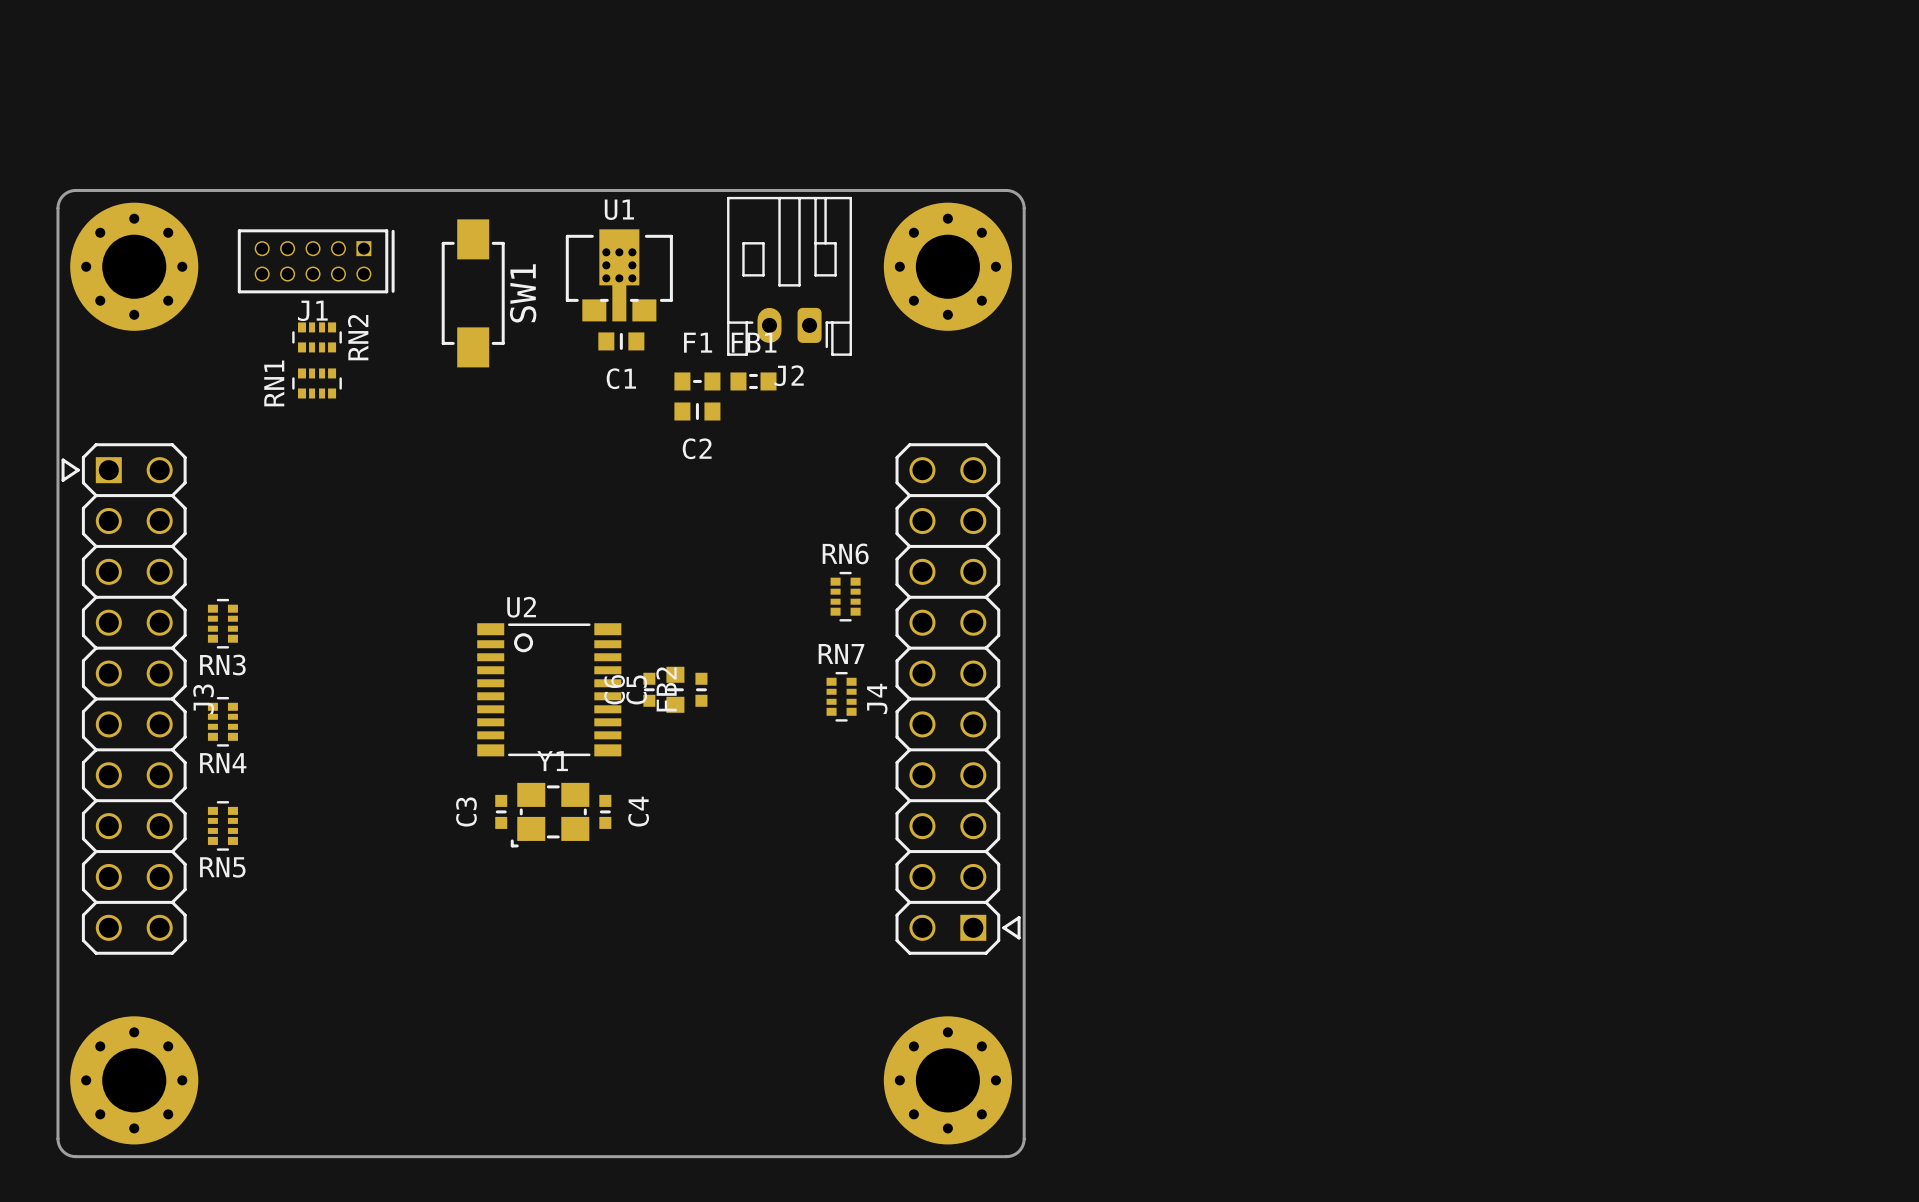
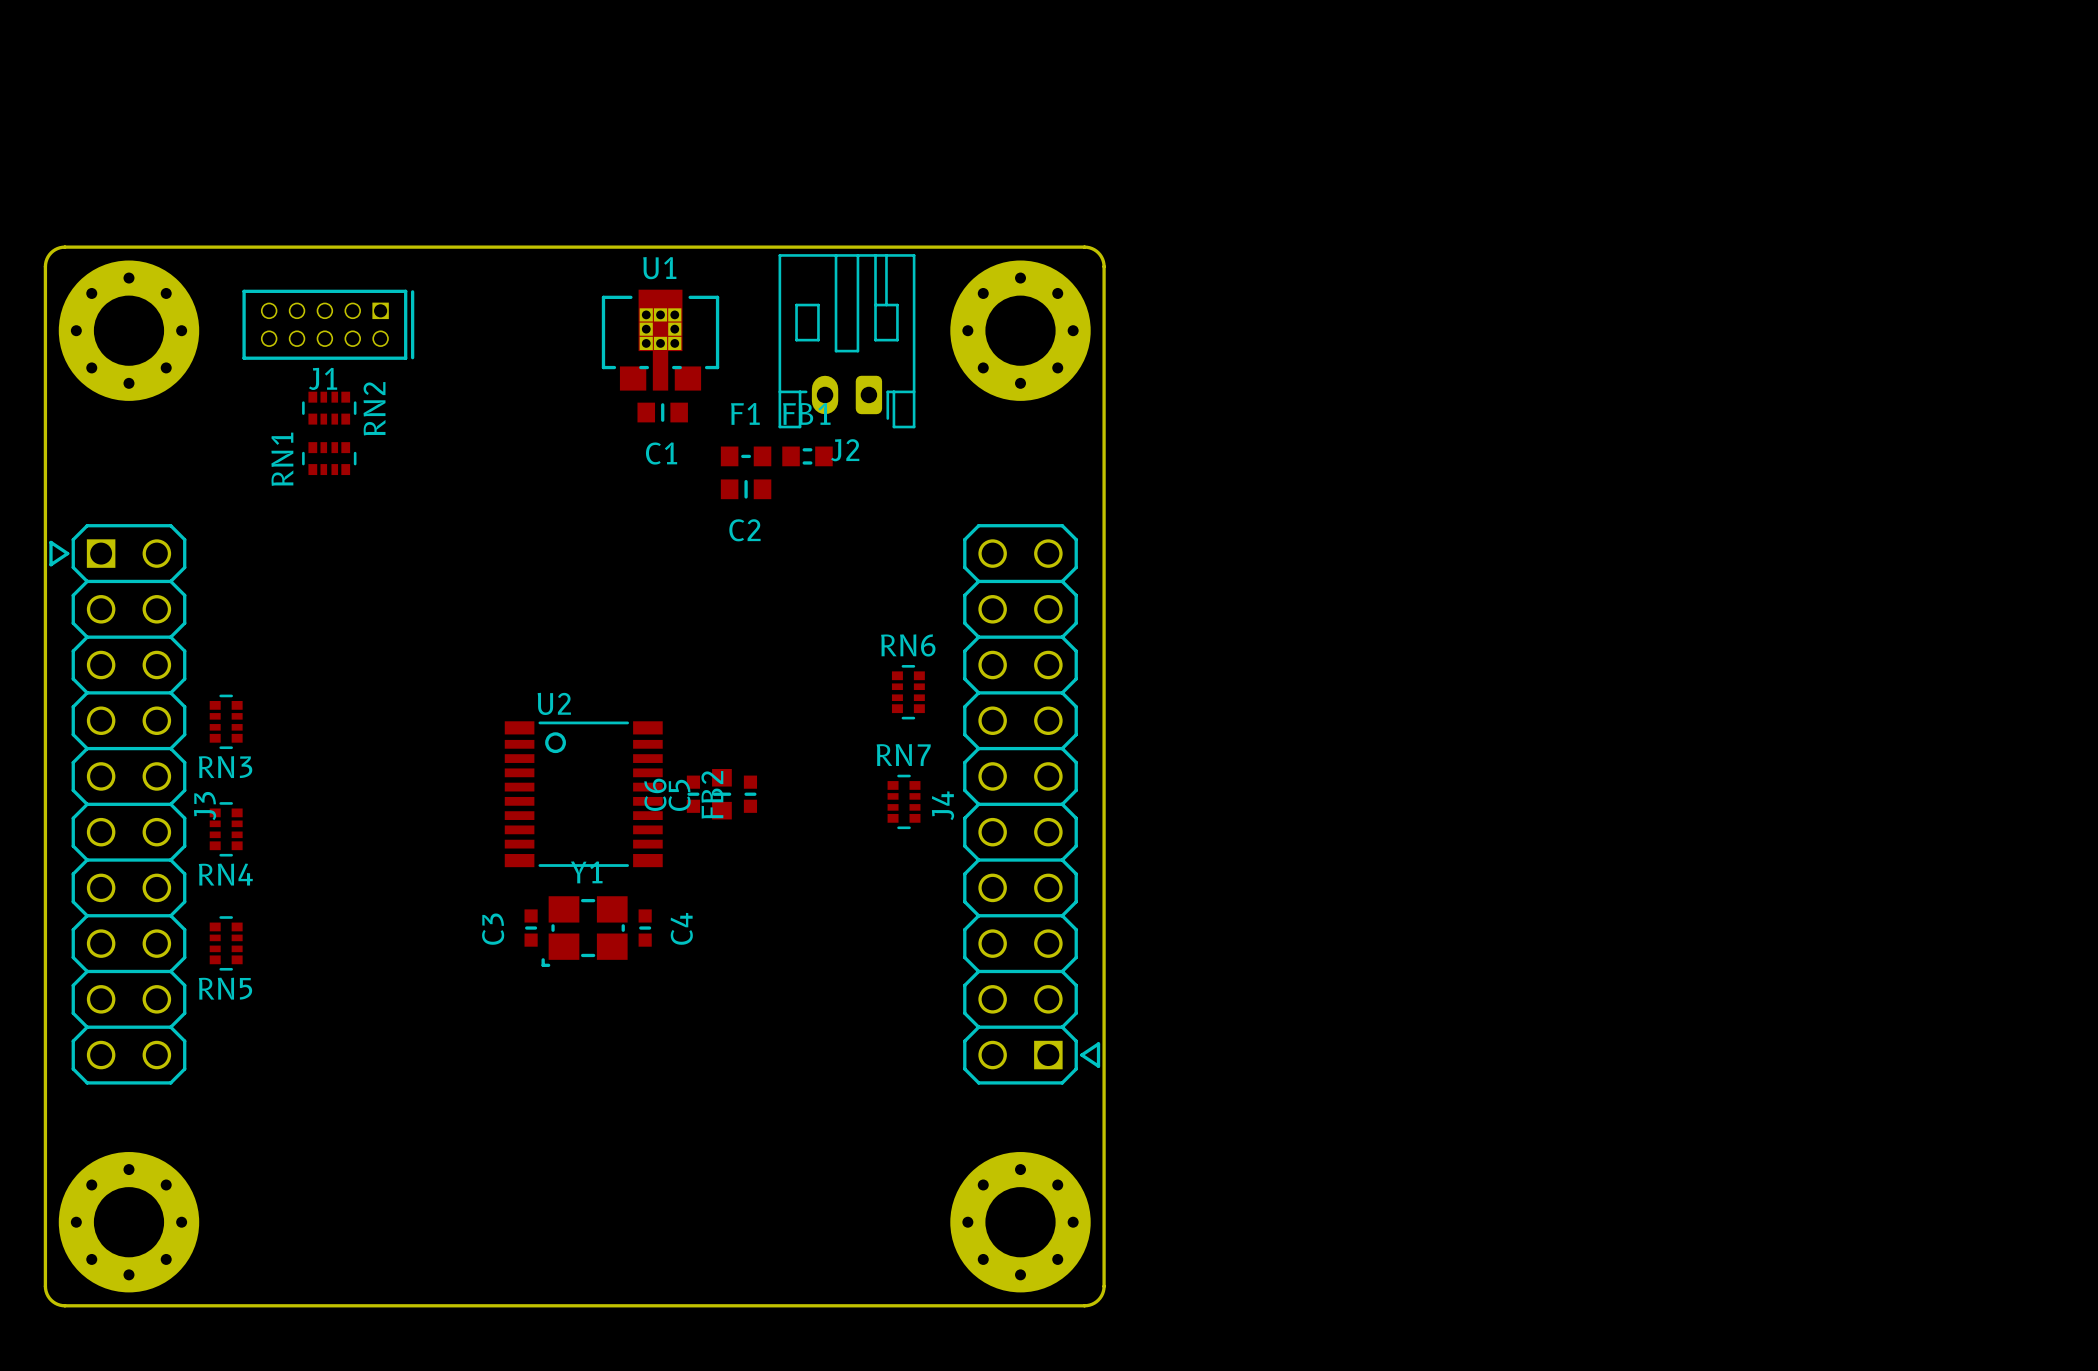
SW1: (473, 293) -> none

